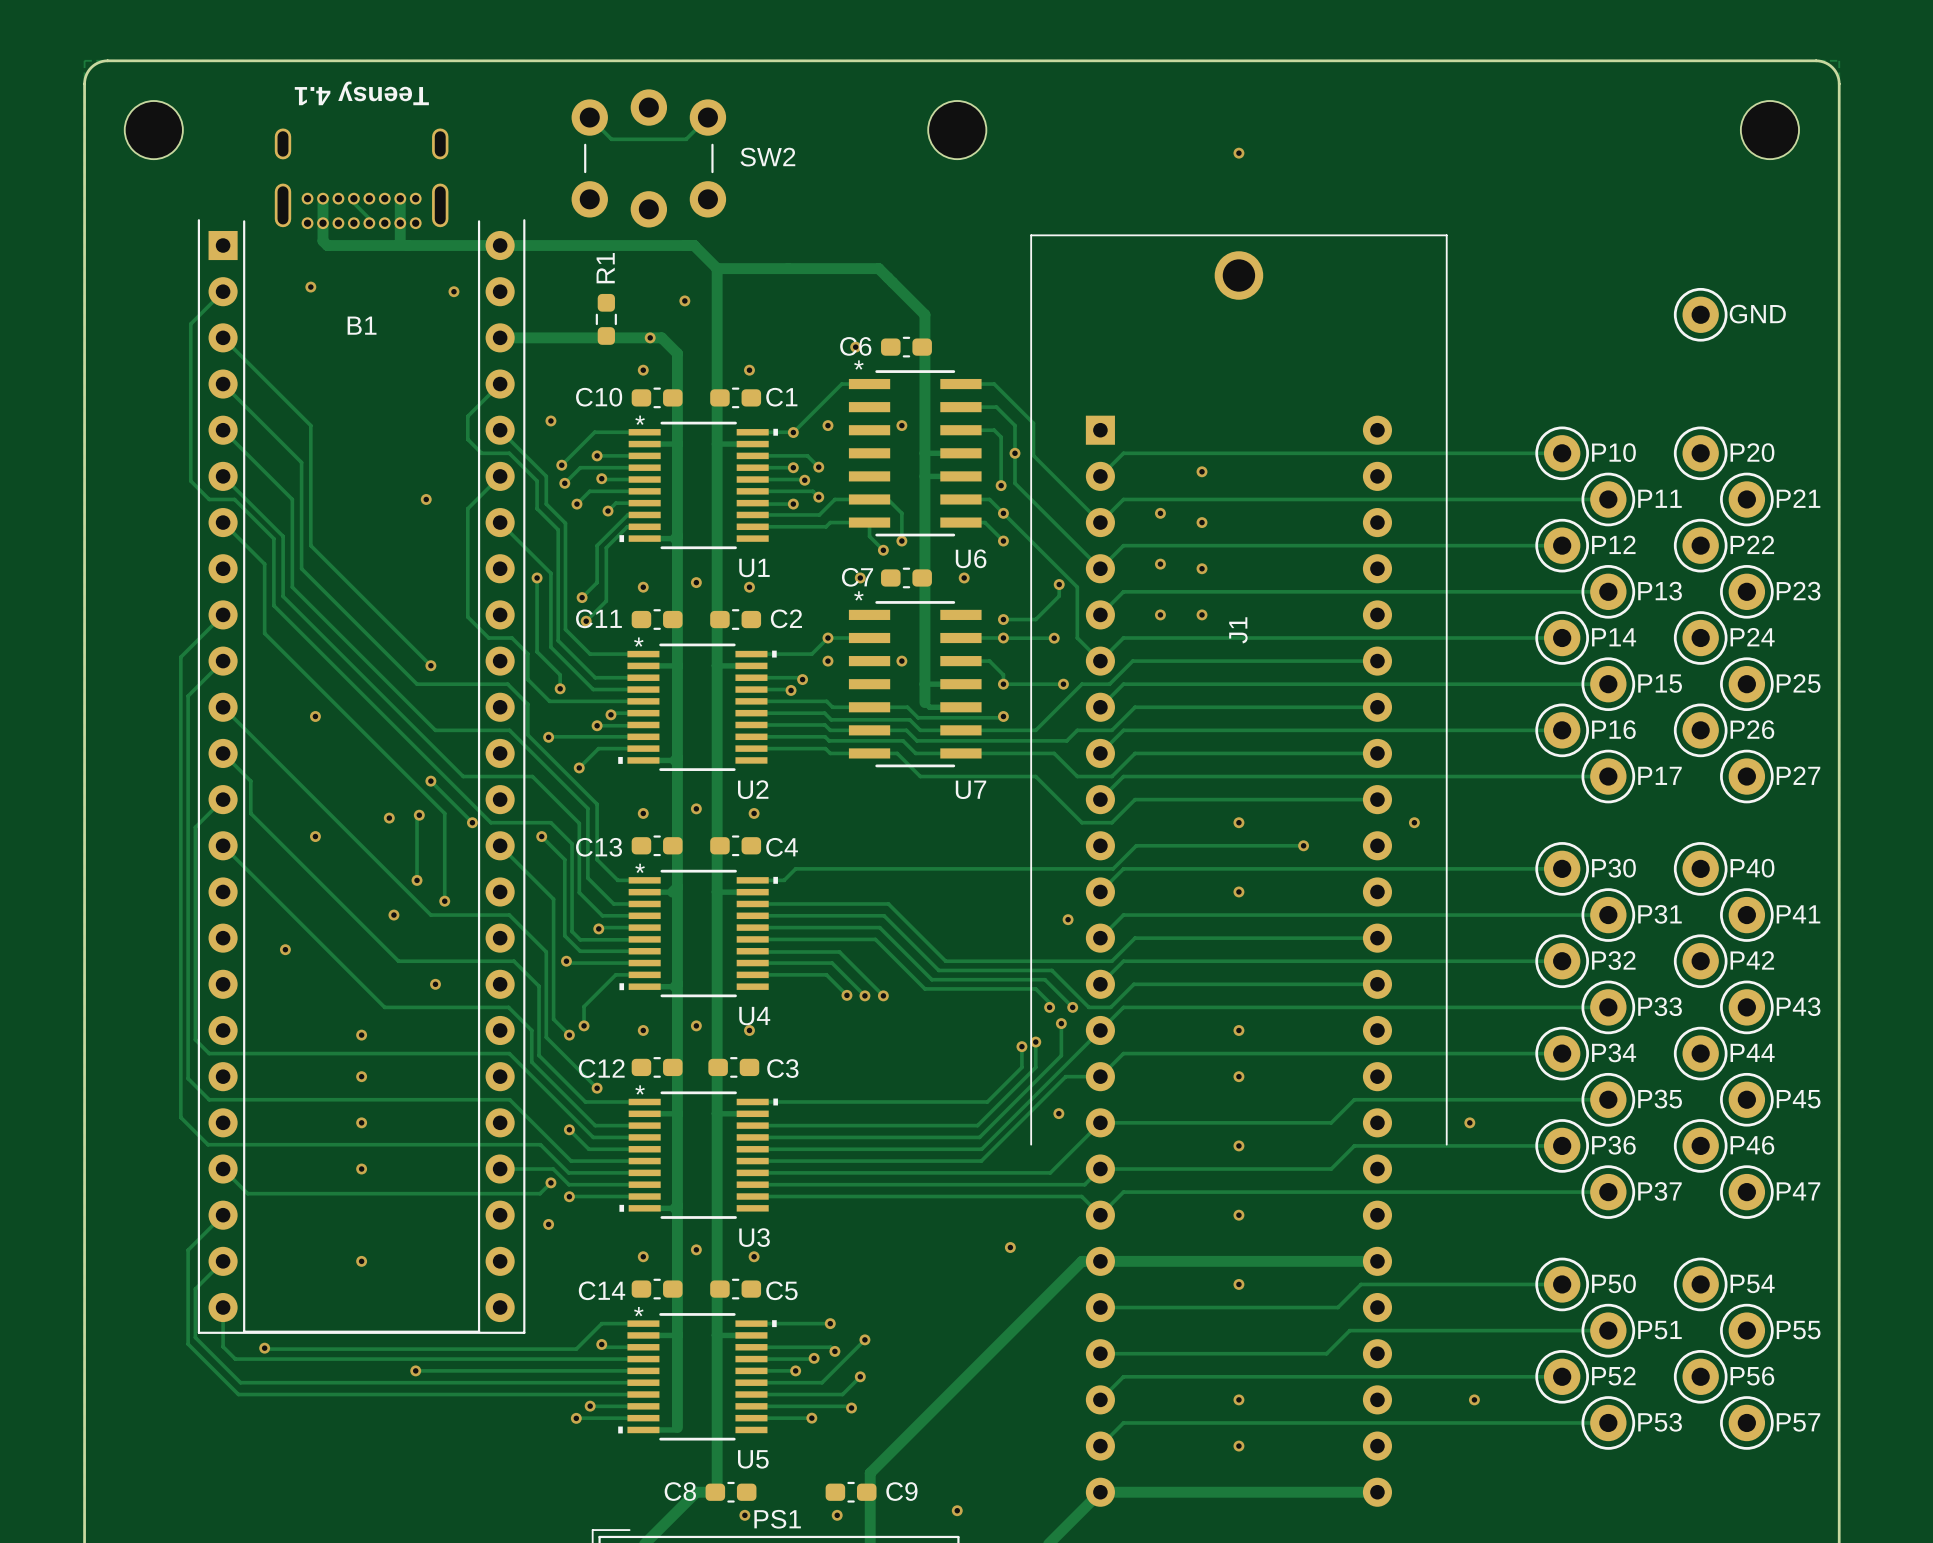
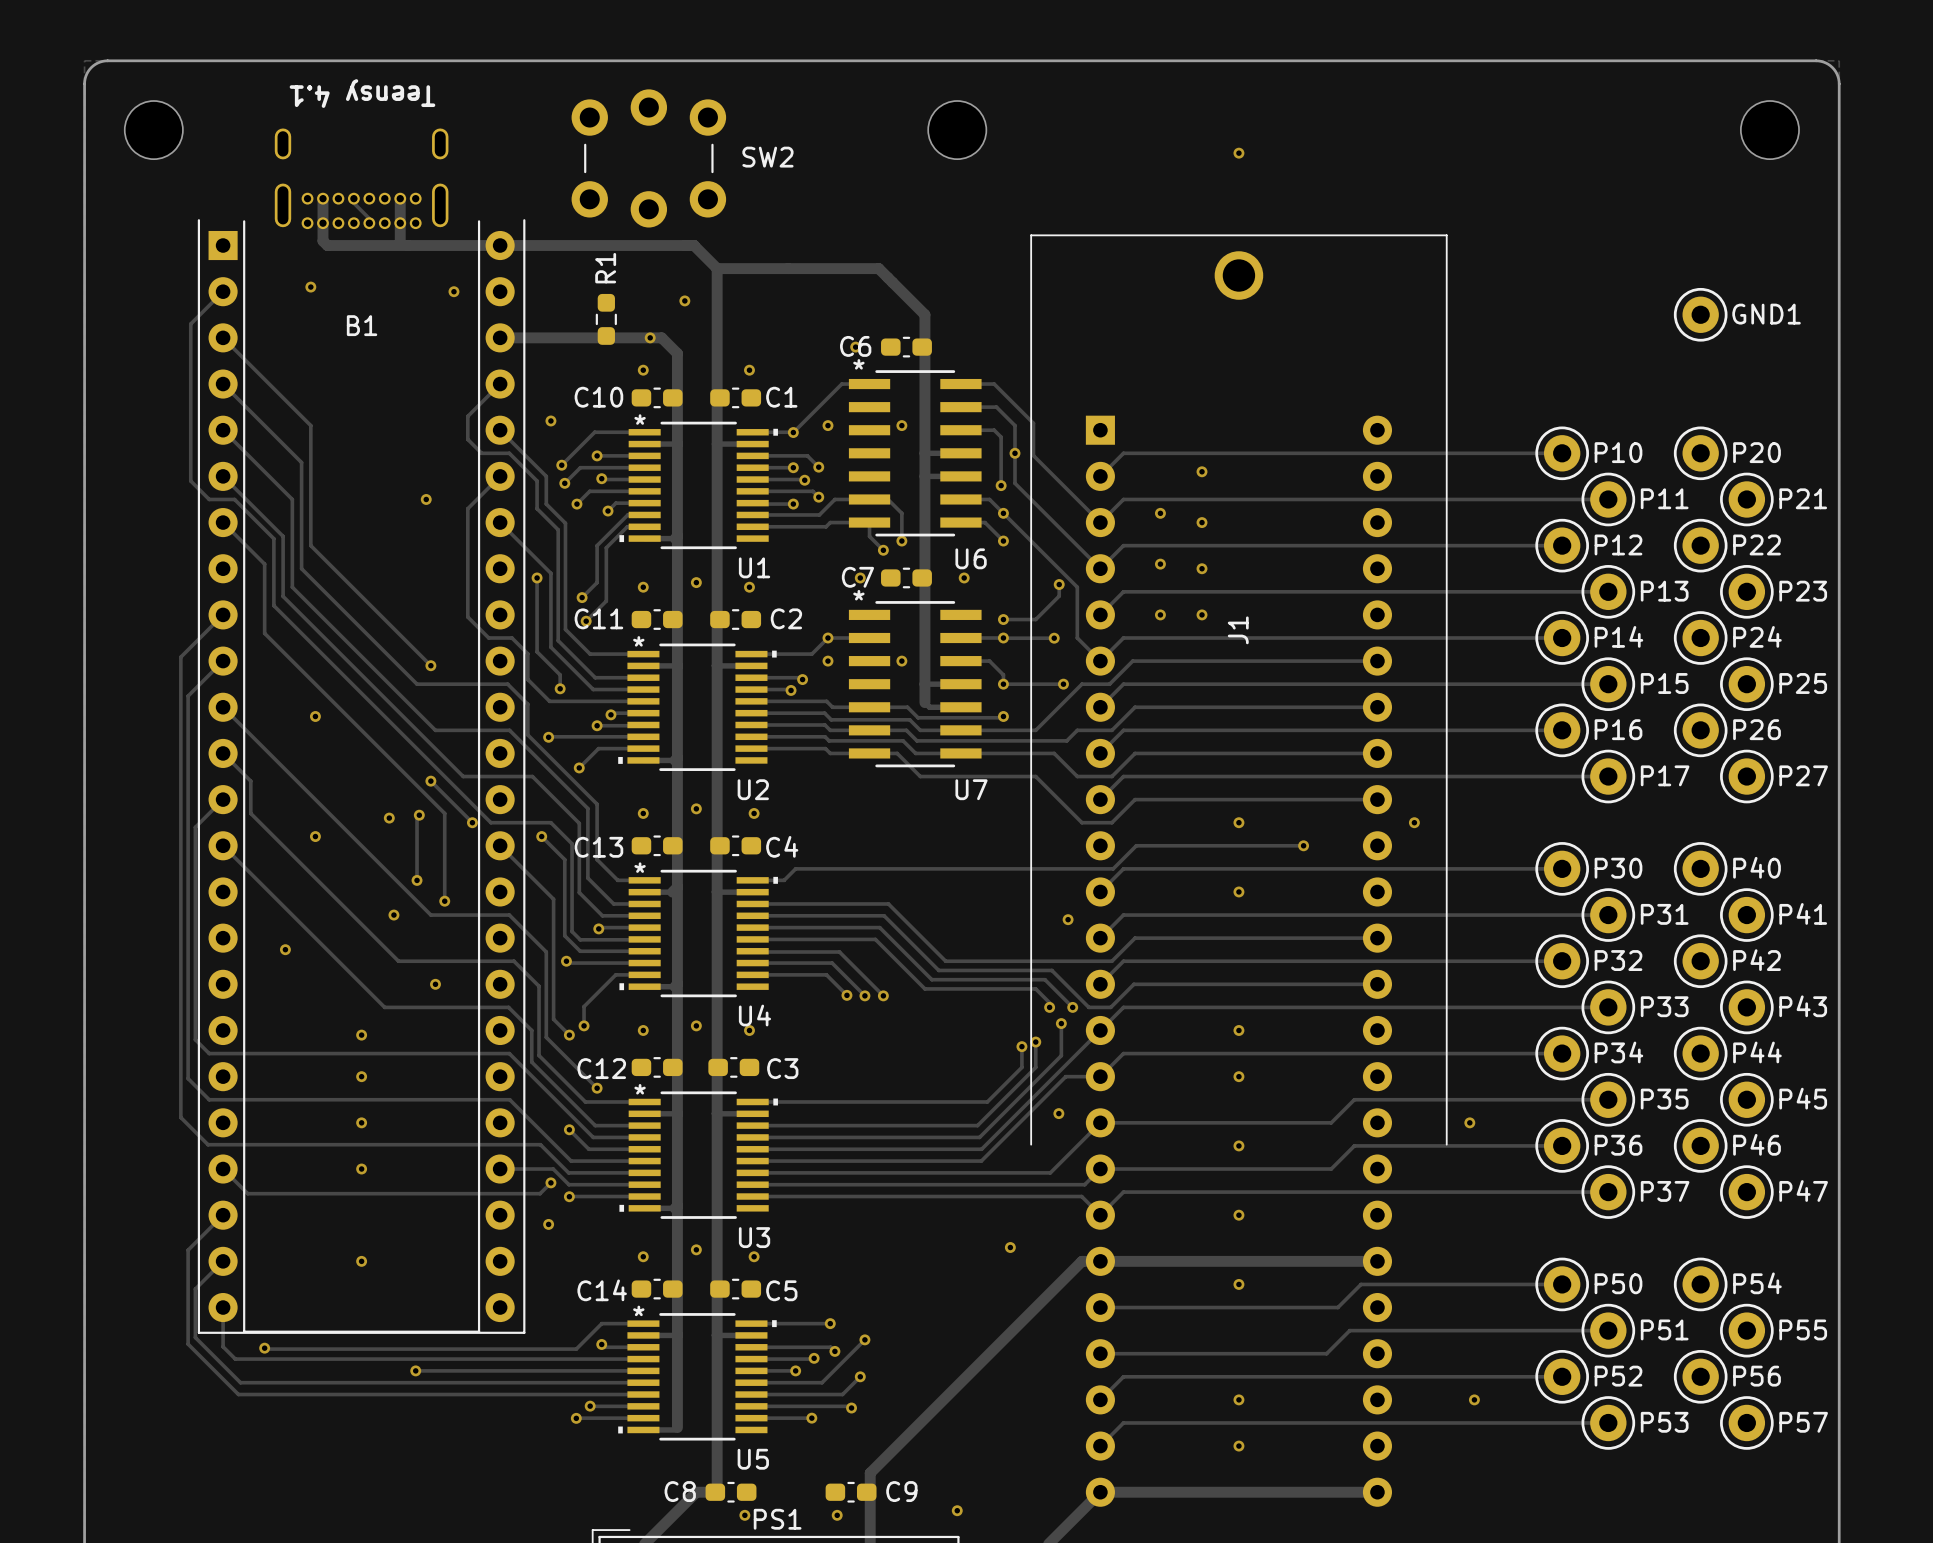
track: (589, 117) (611, 139) (686, 139) (707, 117) -> none
GND name: GND (1757, 314) -> GND1 (1766, 314)

